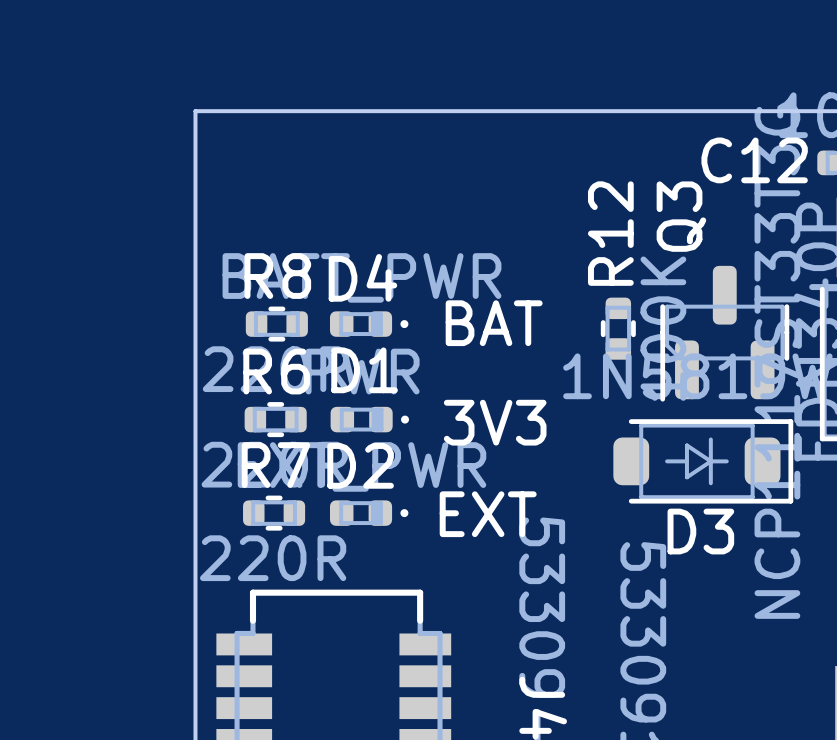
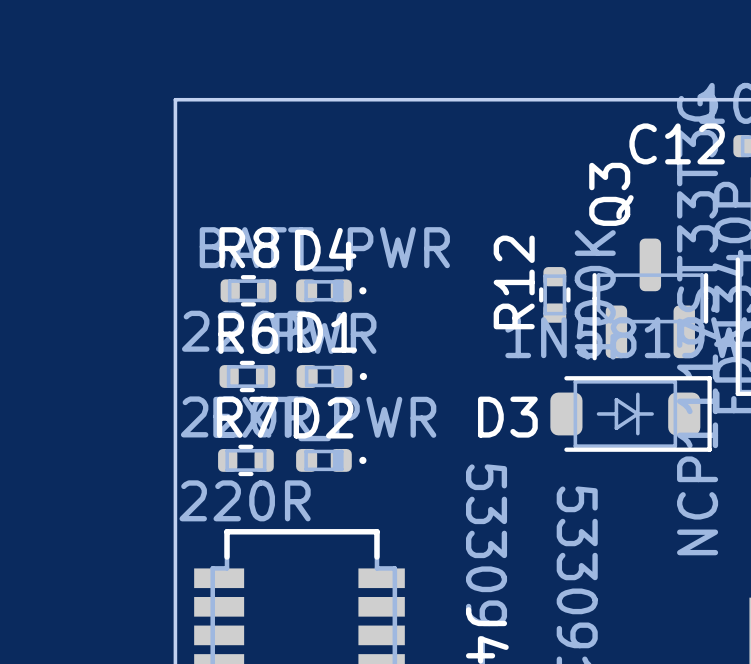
R12 name position: R12 (610, 233) -> R12 (514, 282)
text: BAT (494, 323) -> none
text: 3V3 (495, 422) -> none
text: EXT (488, 514) -> none
D3 name position: D3 (700, 531) -> D3 (507, 417)

